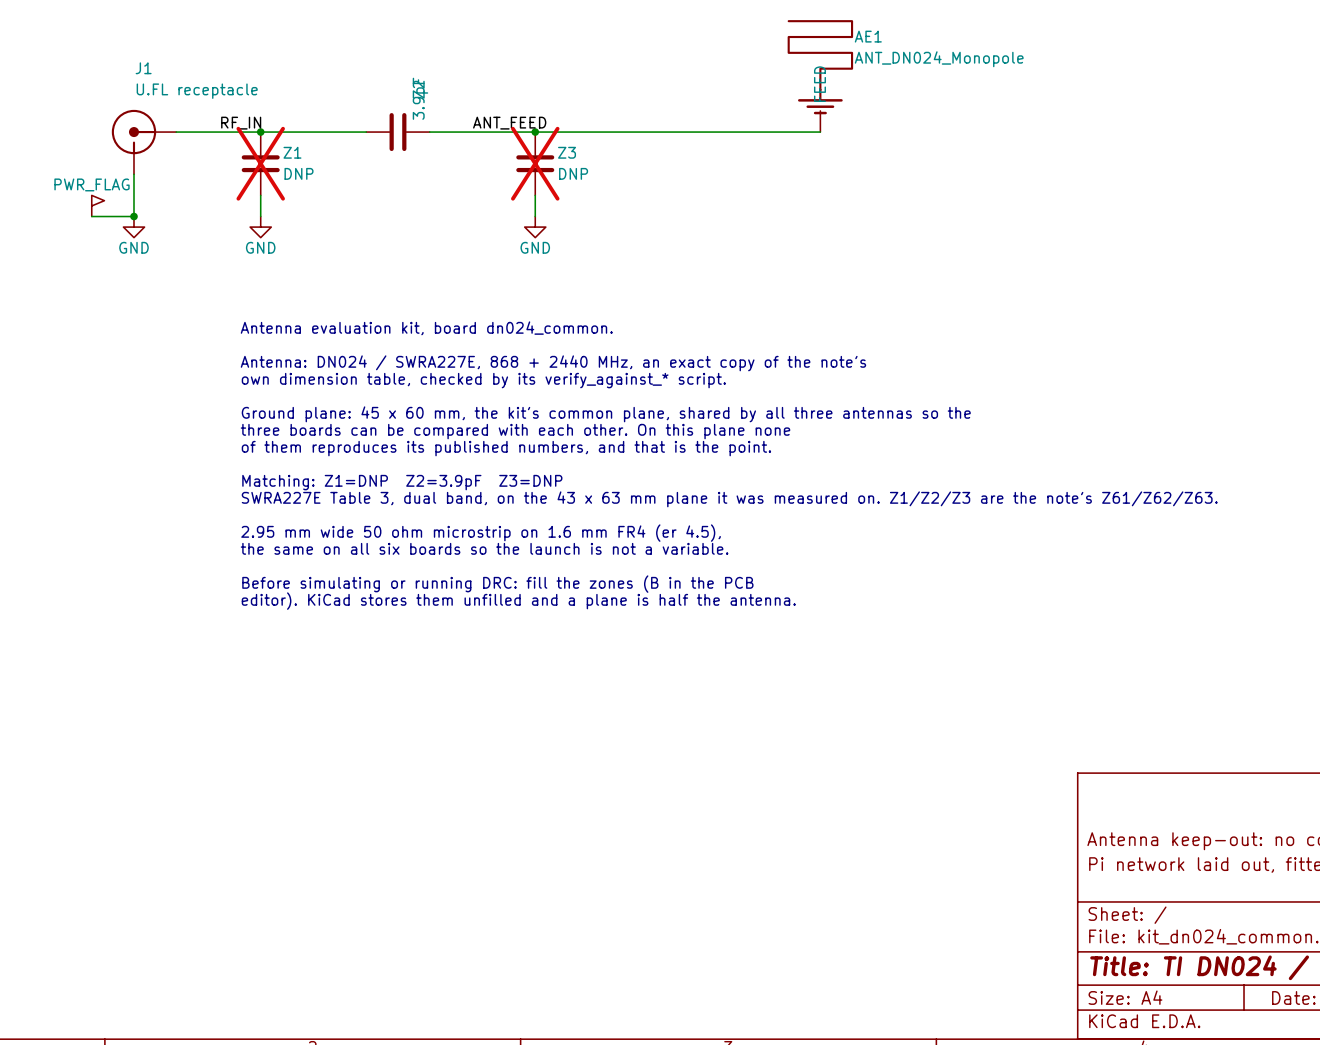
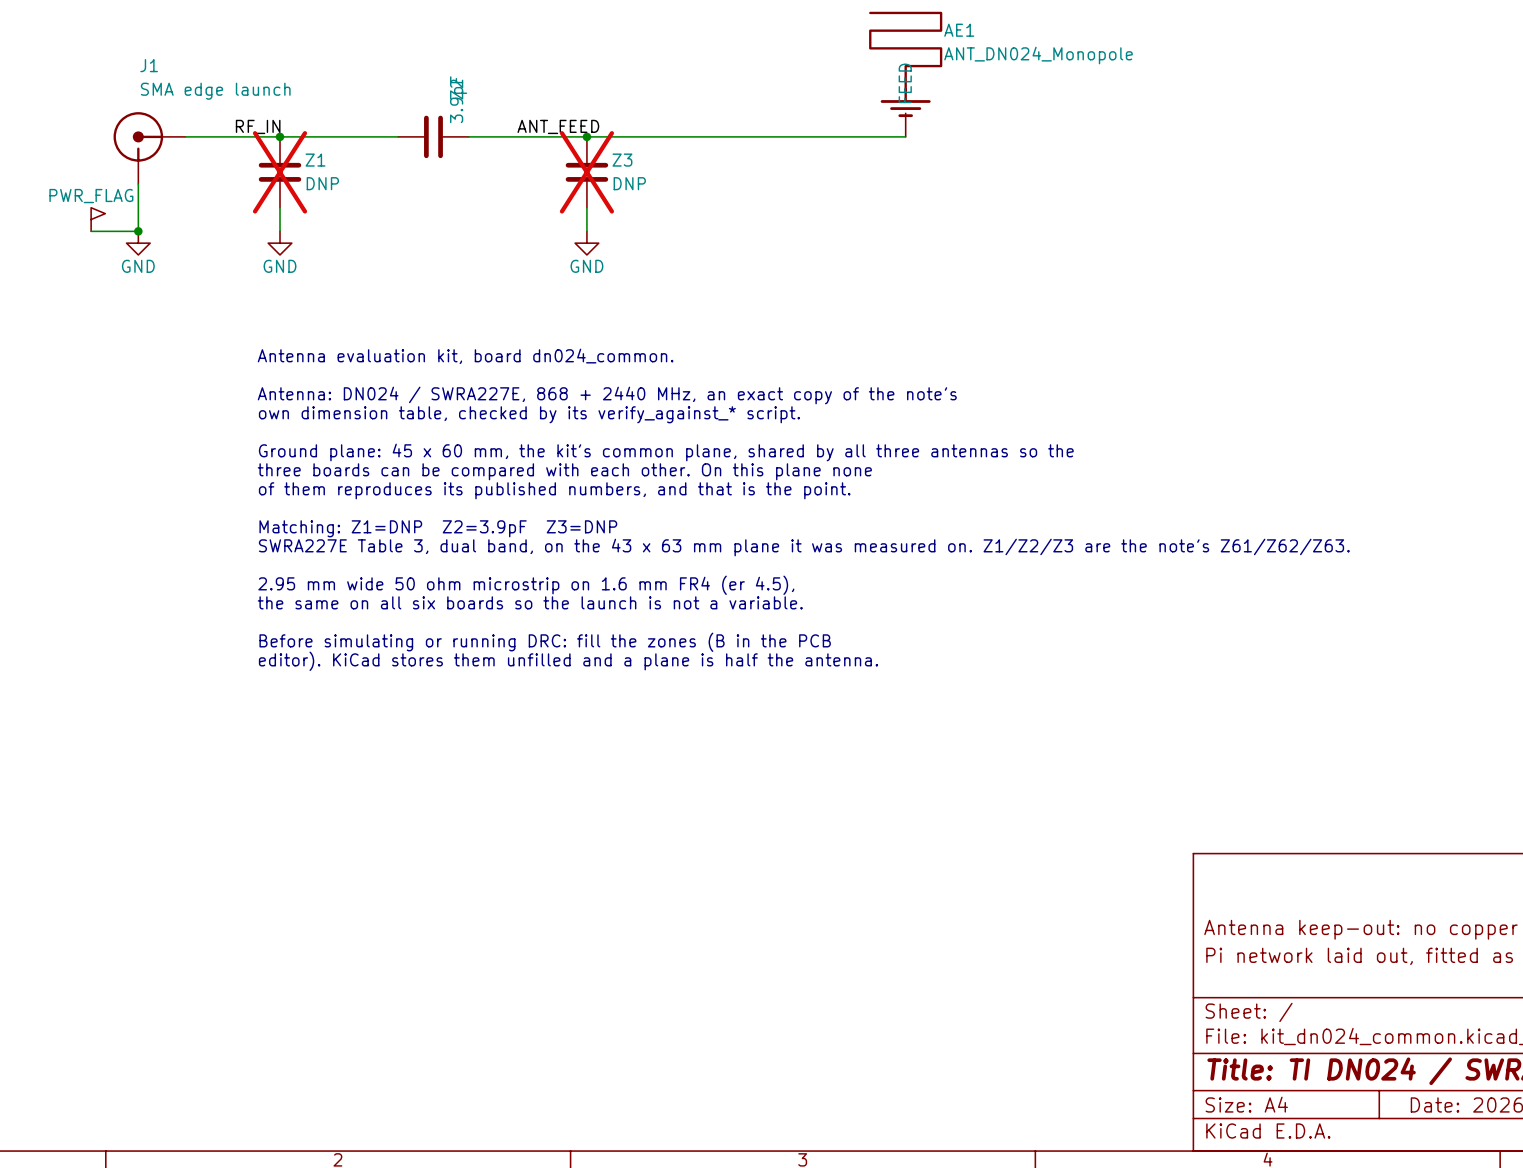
J1 value: U.FL receptacle (197, 91) -> SMA edge launch (215, 91)

